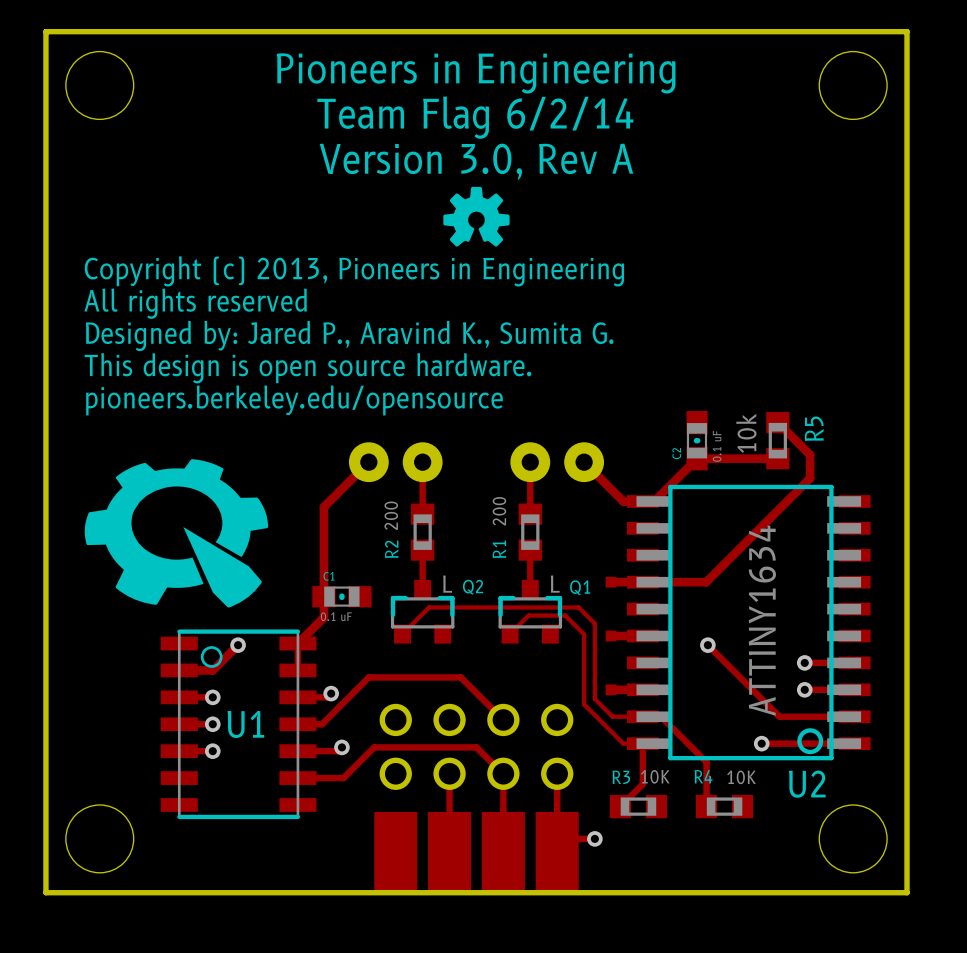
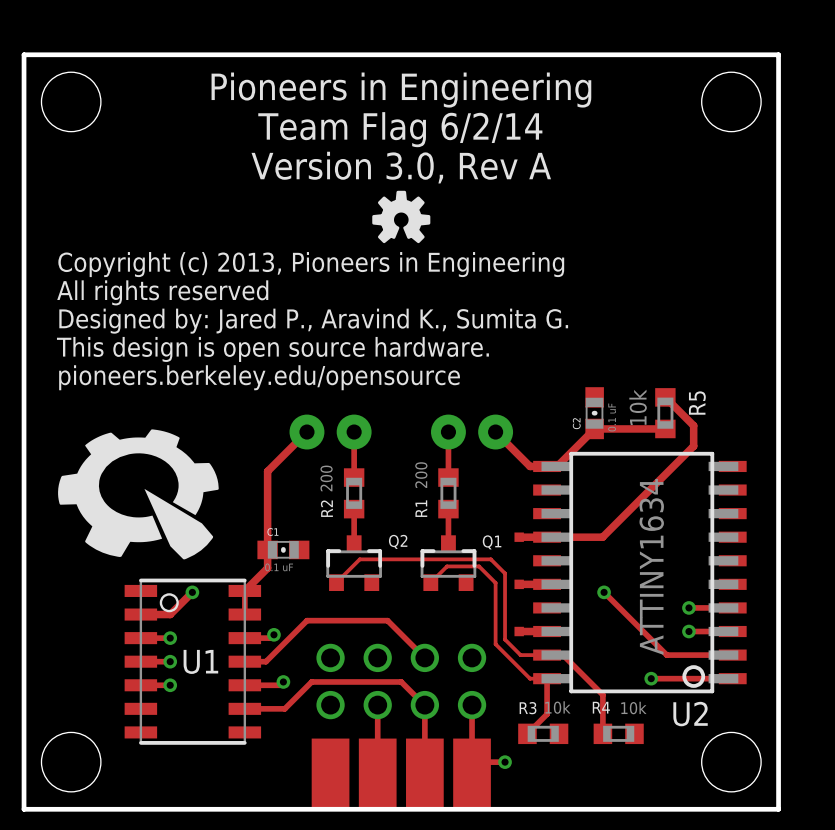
Q2 text: L (447, 584) -> none
Q1 text: L (555, 584) -> none
R3 value: 10K (655, 776) -> 10k (557, 707)
R4 value: 10K (741, 777) -> 10k (633, 708)

